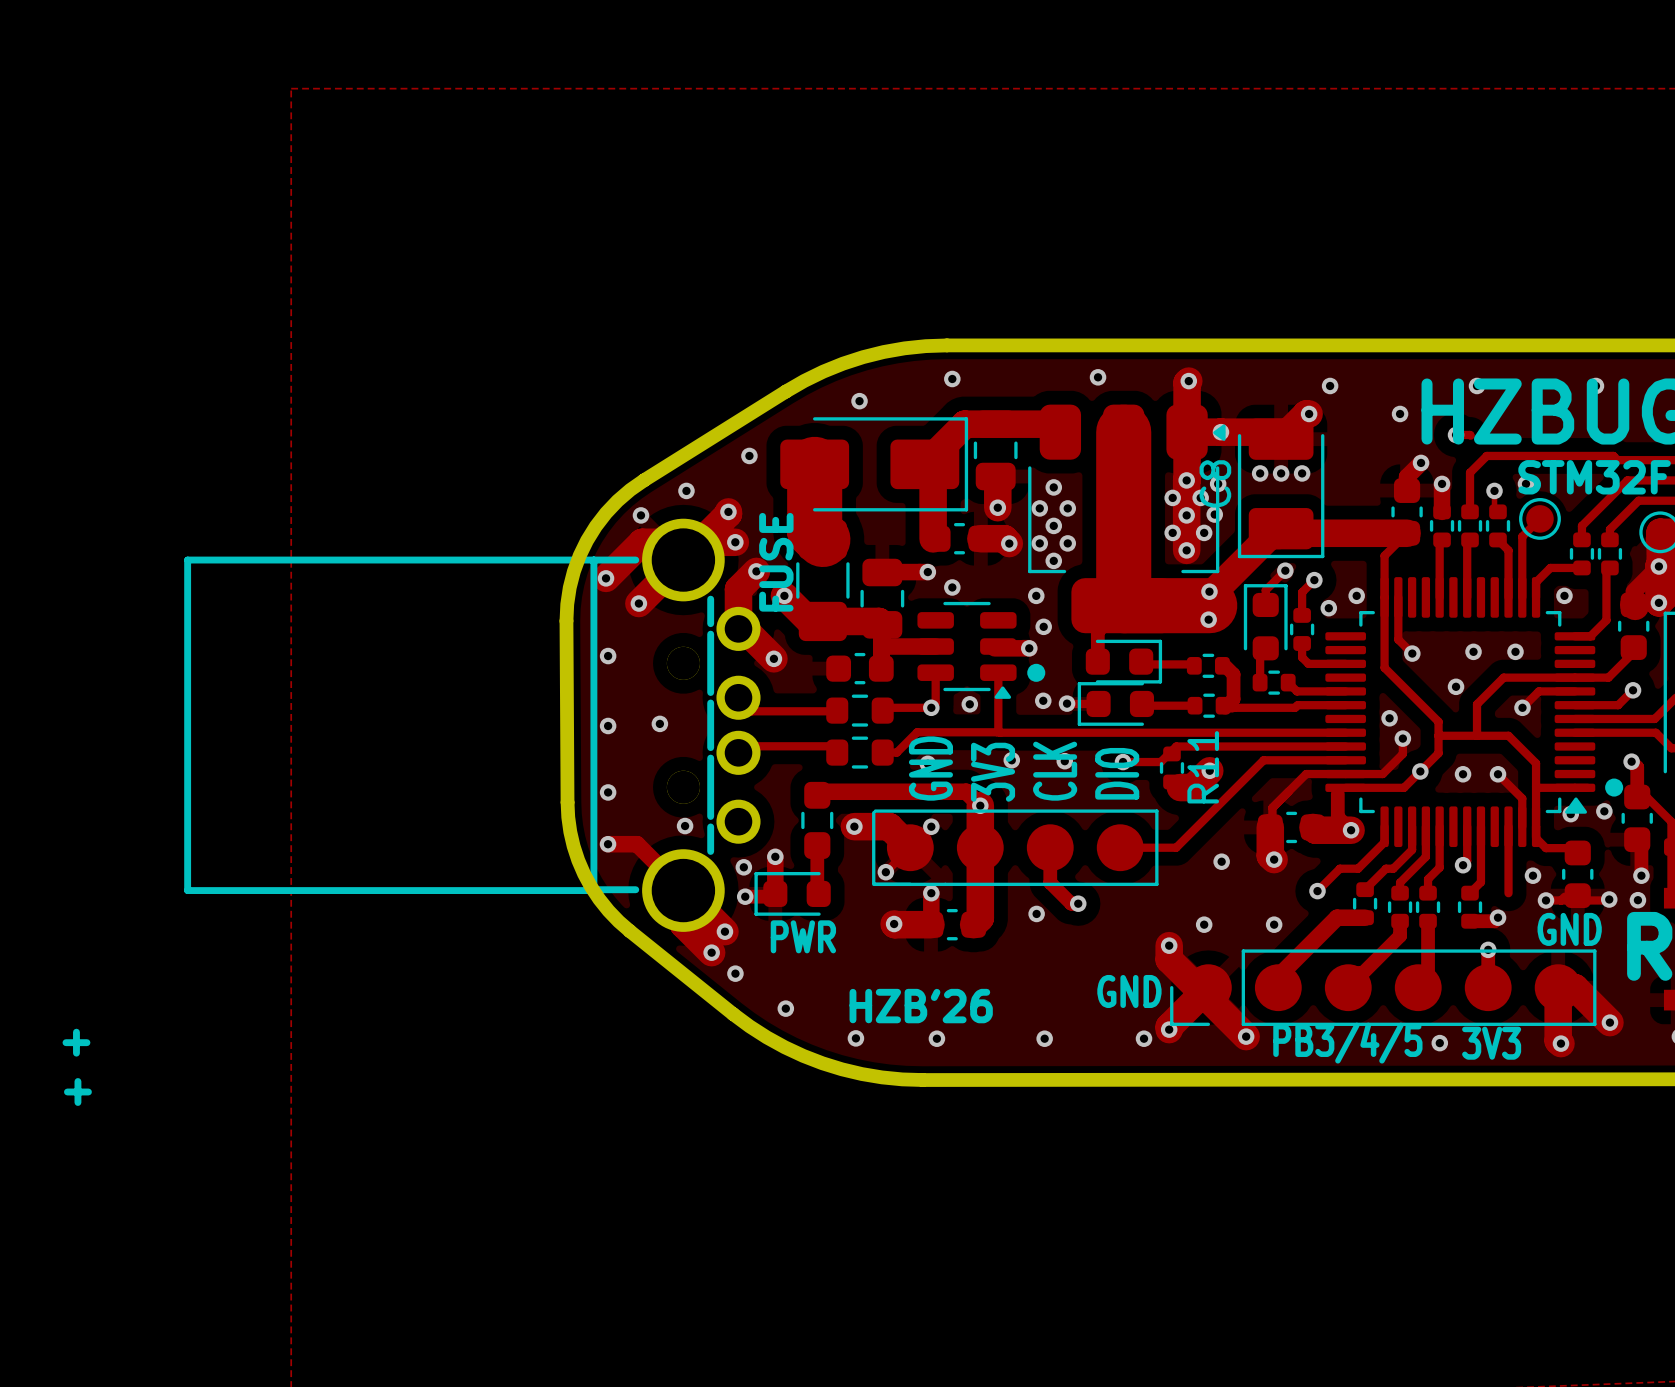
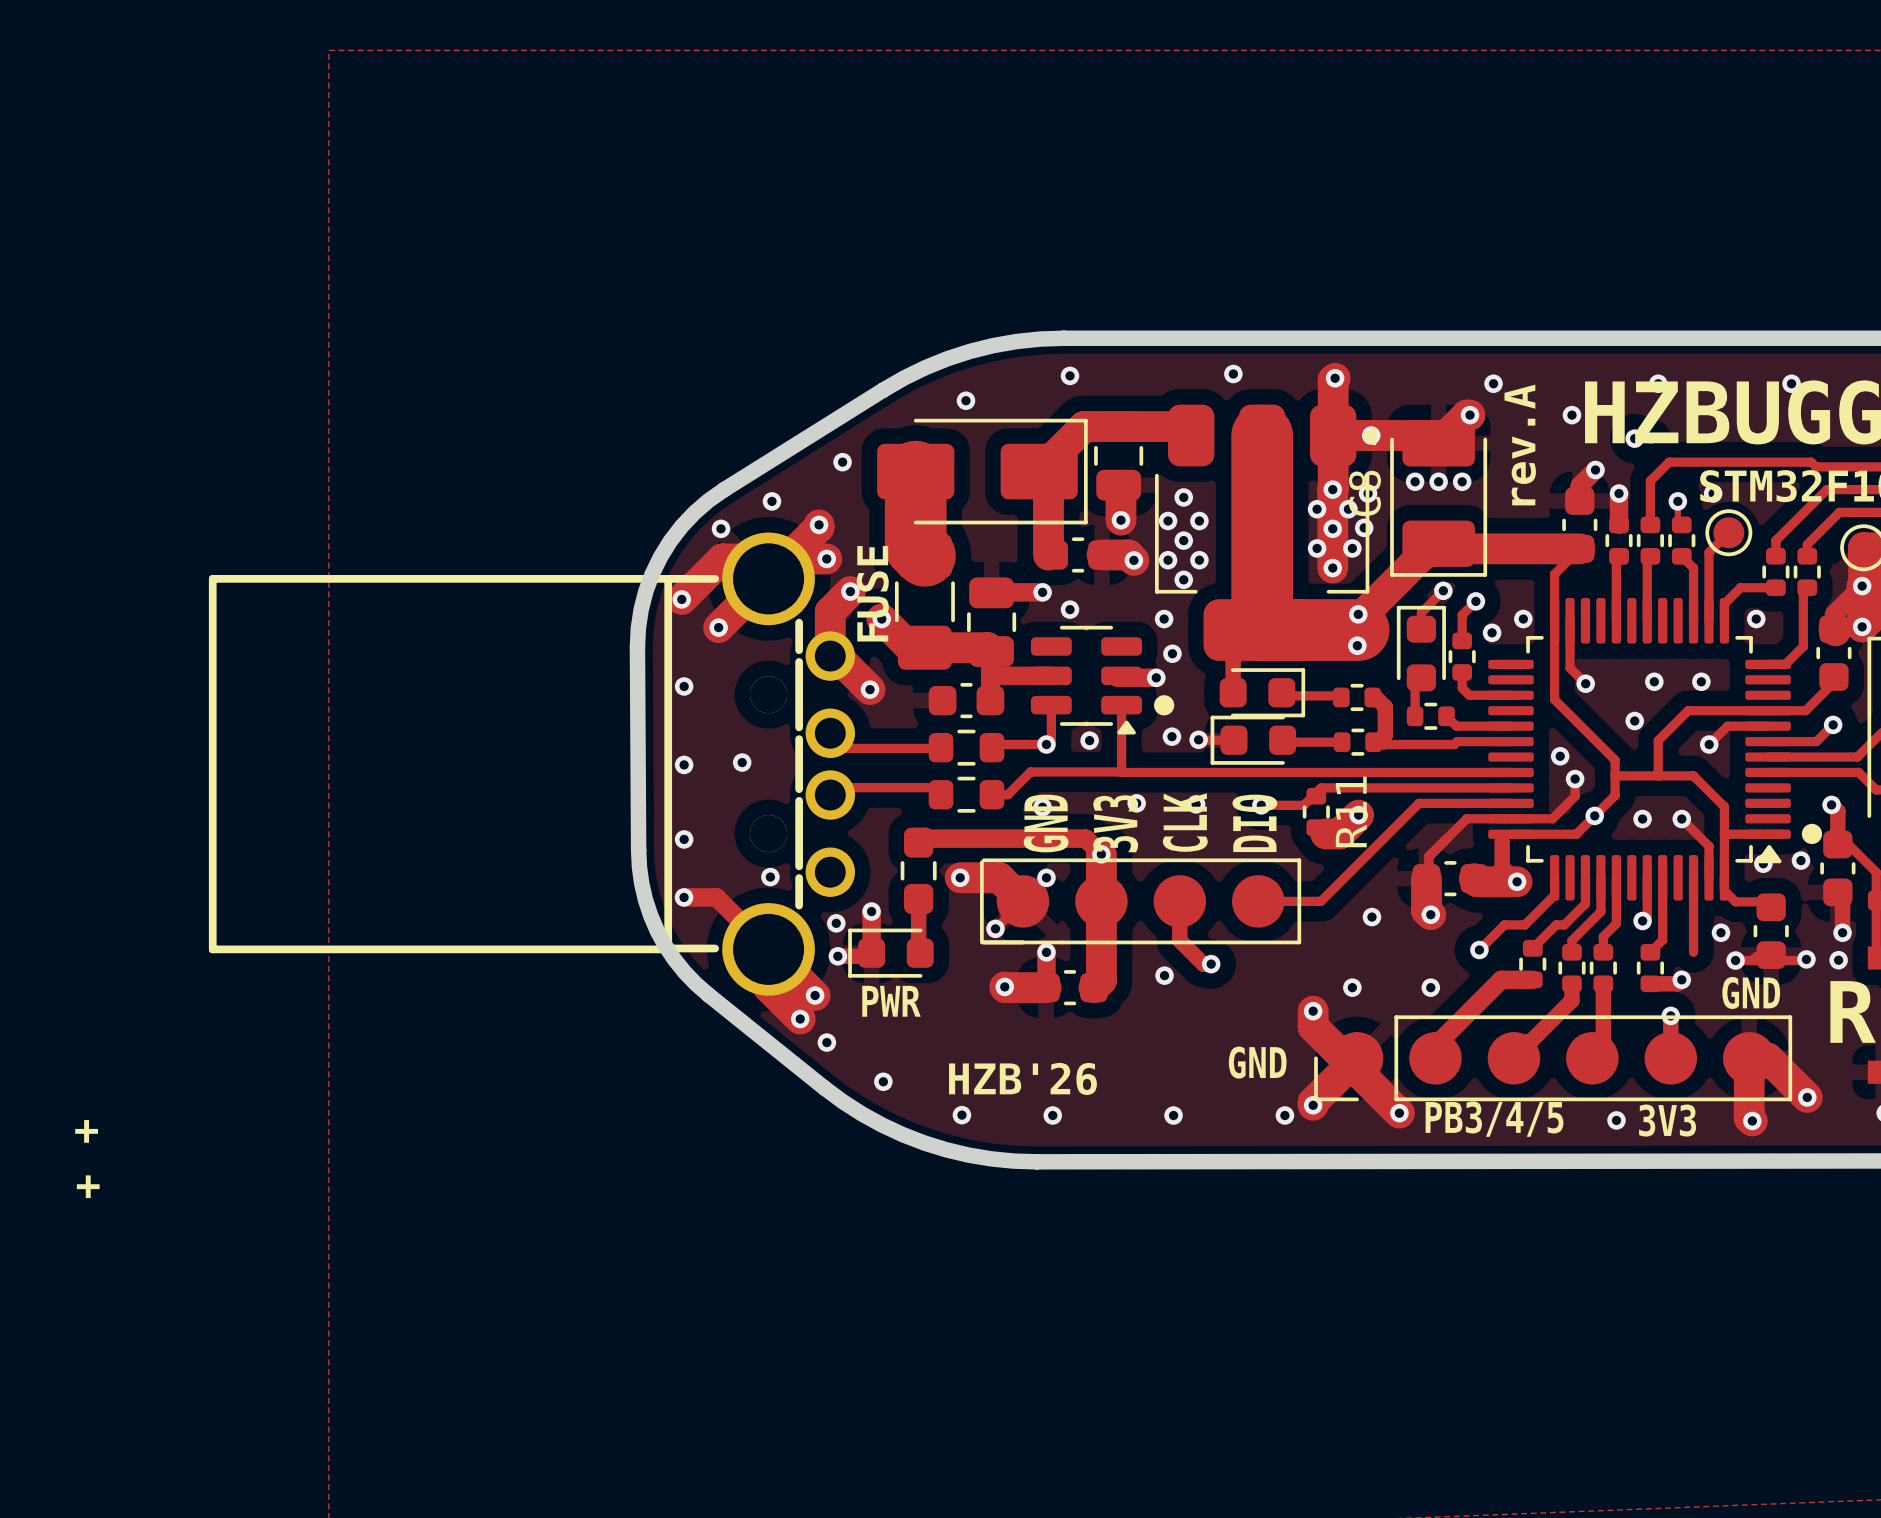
text: none -> rev.A (1520, 444)

